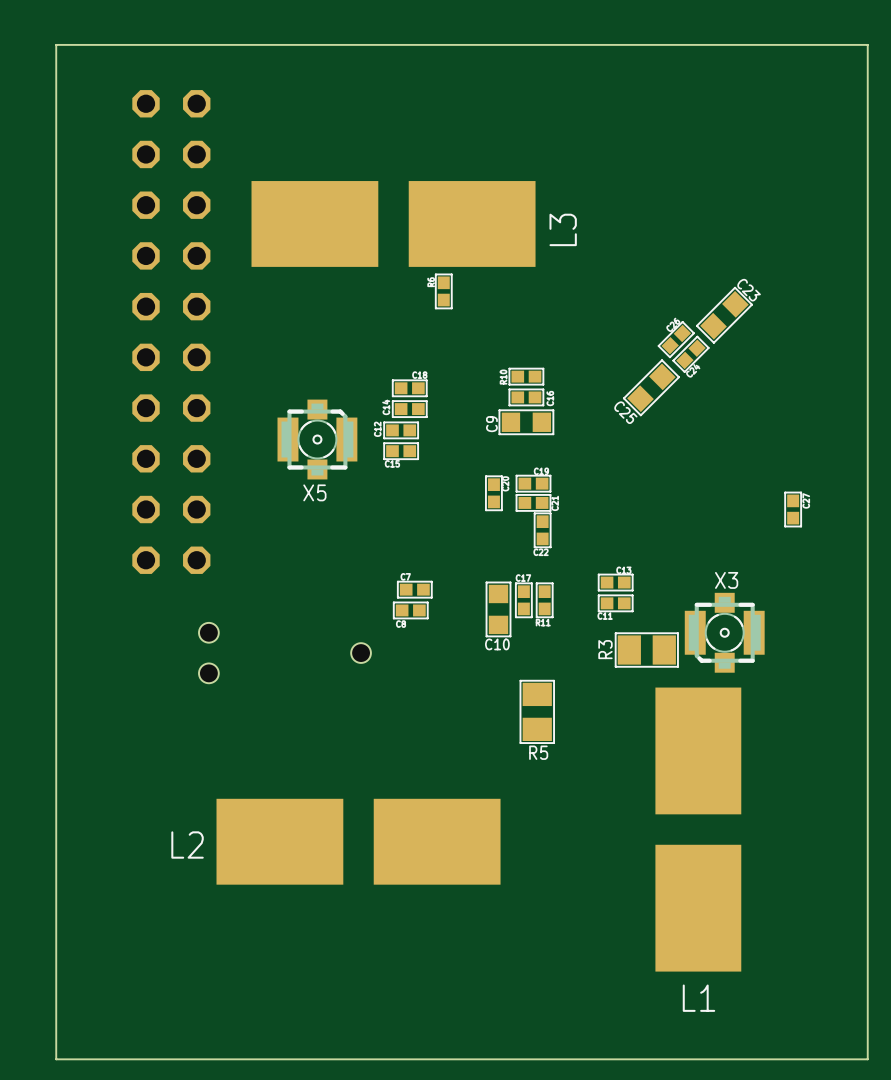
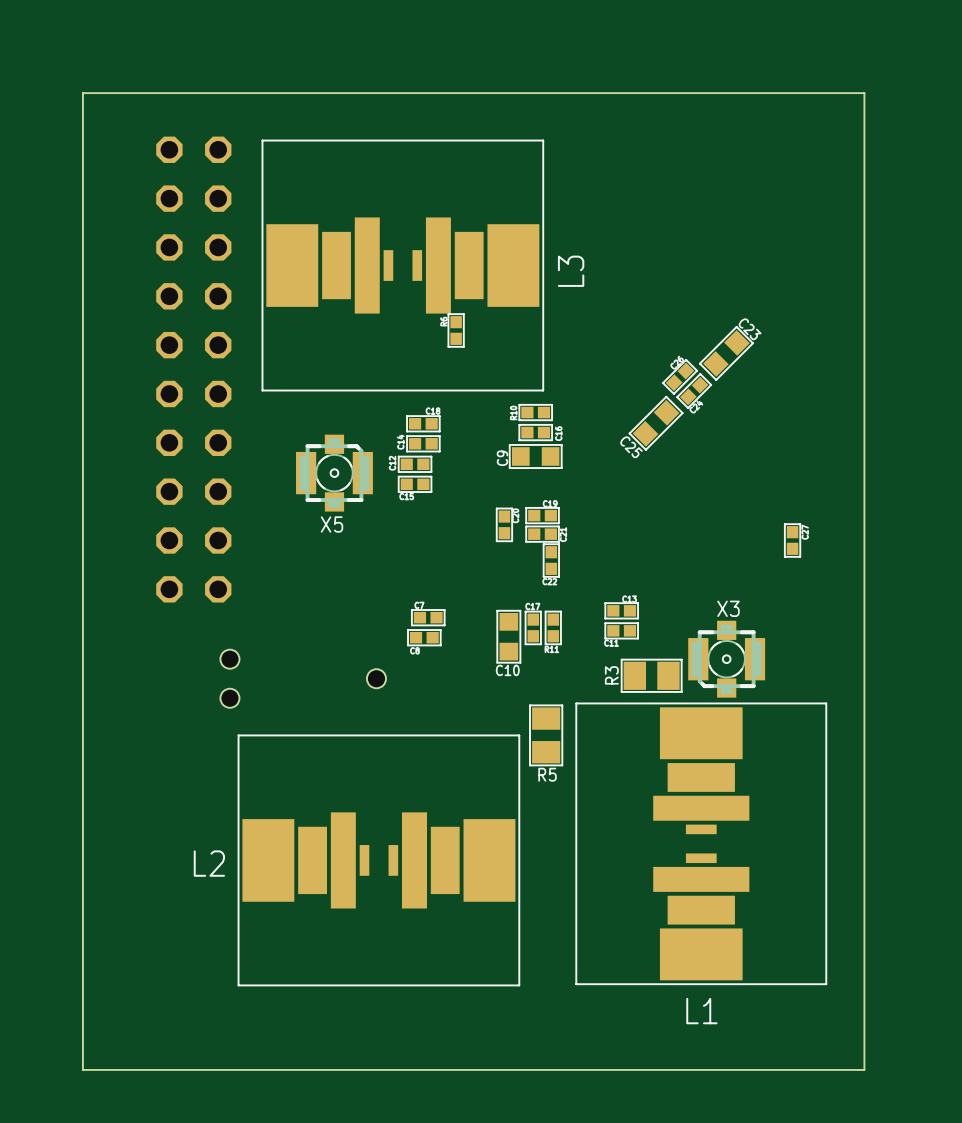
L3 footprint: [251, 181, 536, 267] -> [262, 140, 544, 392]
L1 footprint: [655, 687, 742, 972] -> [575, 702, 827, 985]
L2 footprint: [216, 798, 501, 885] -> [238, 734, 520, 986]

